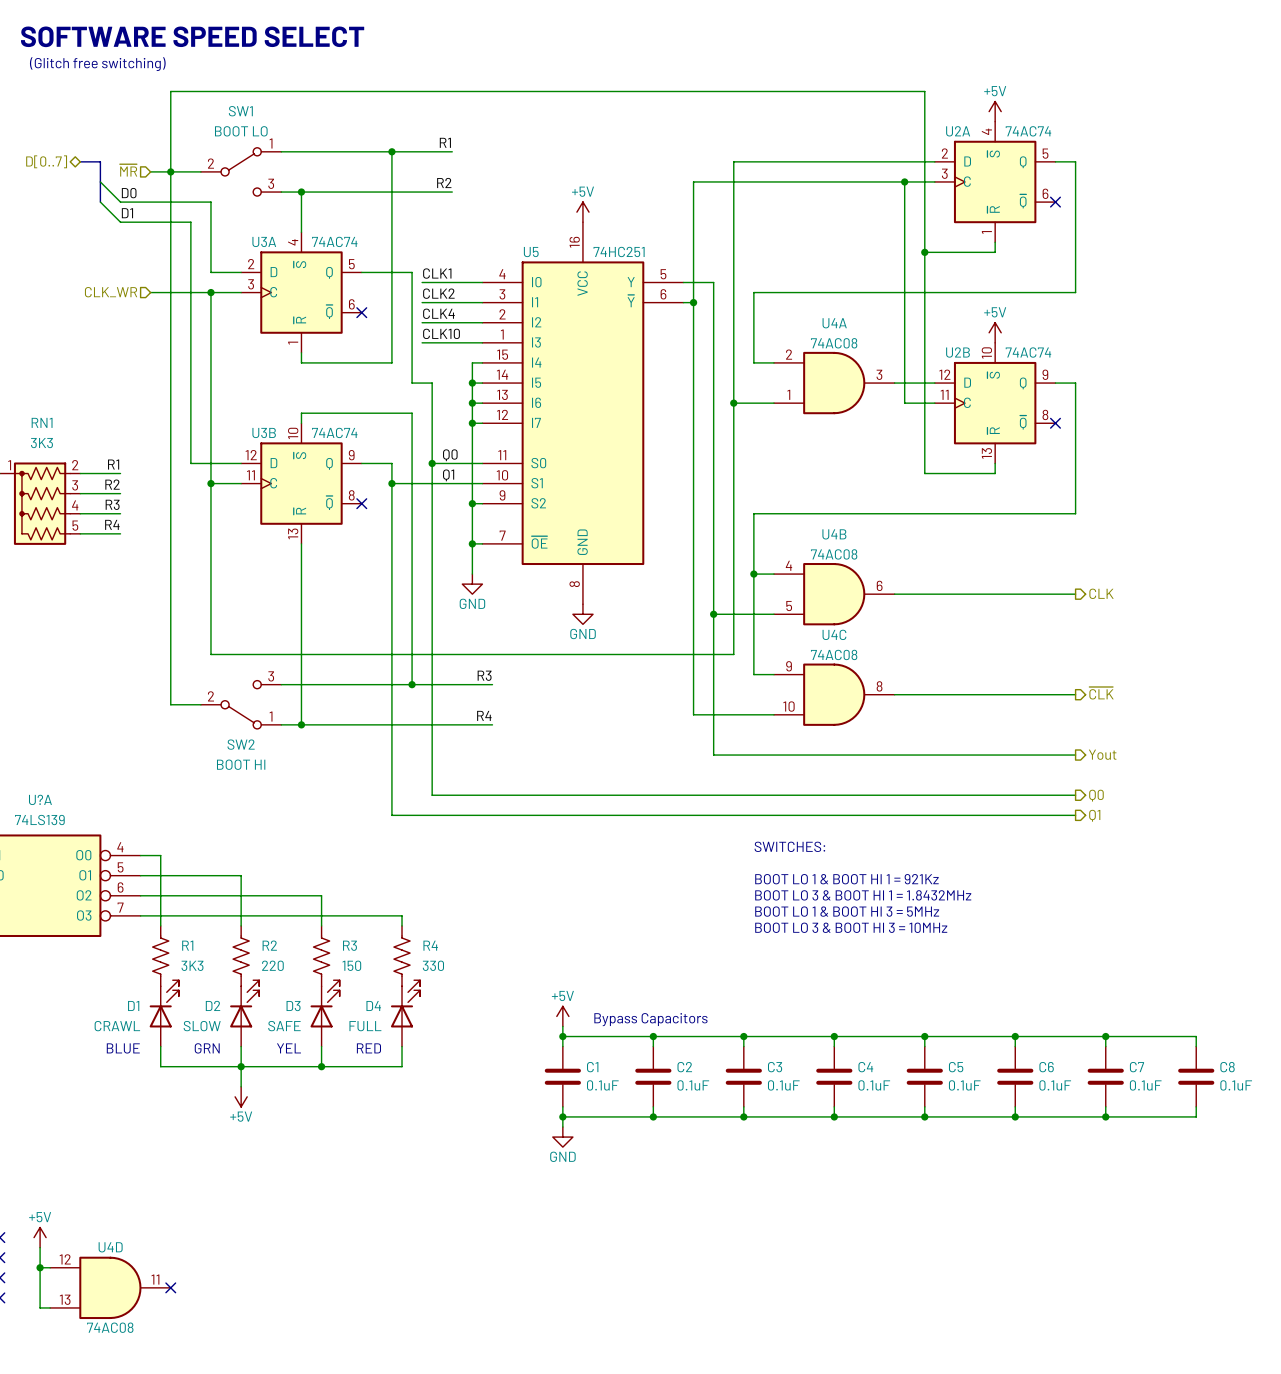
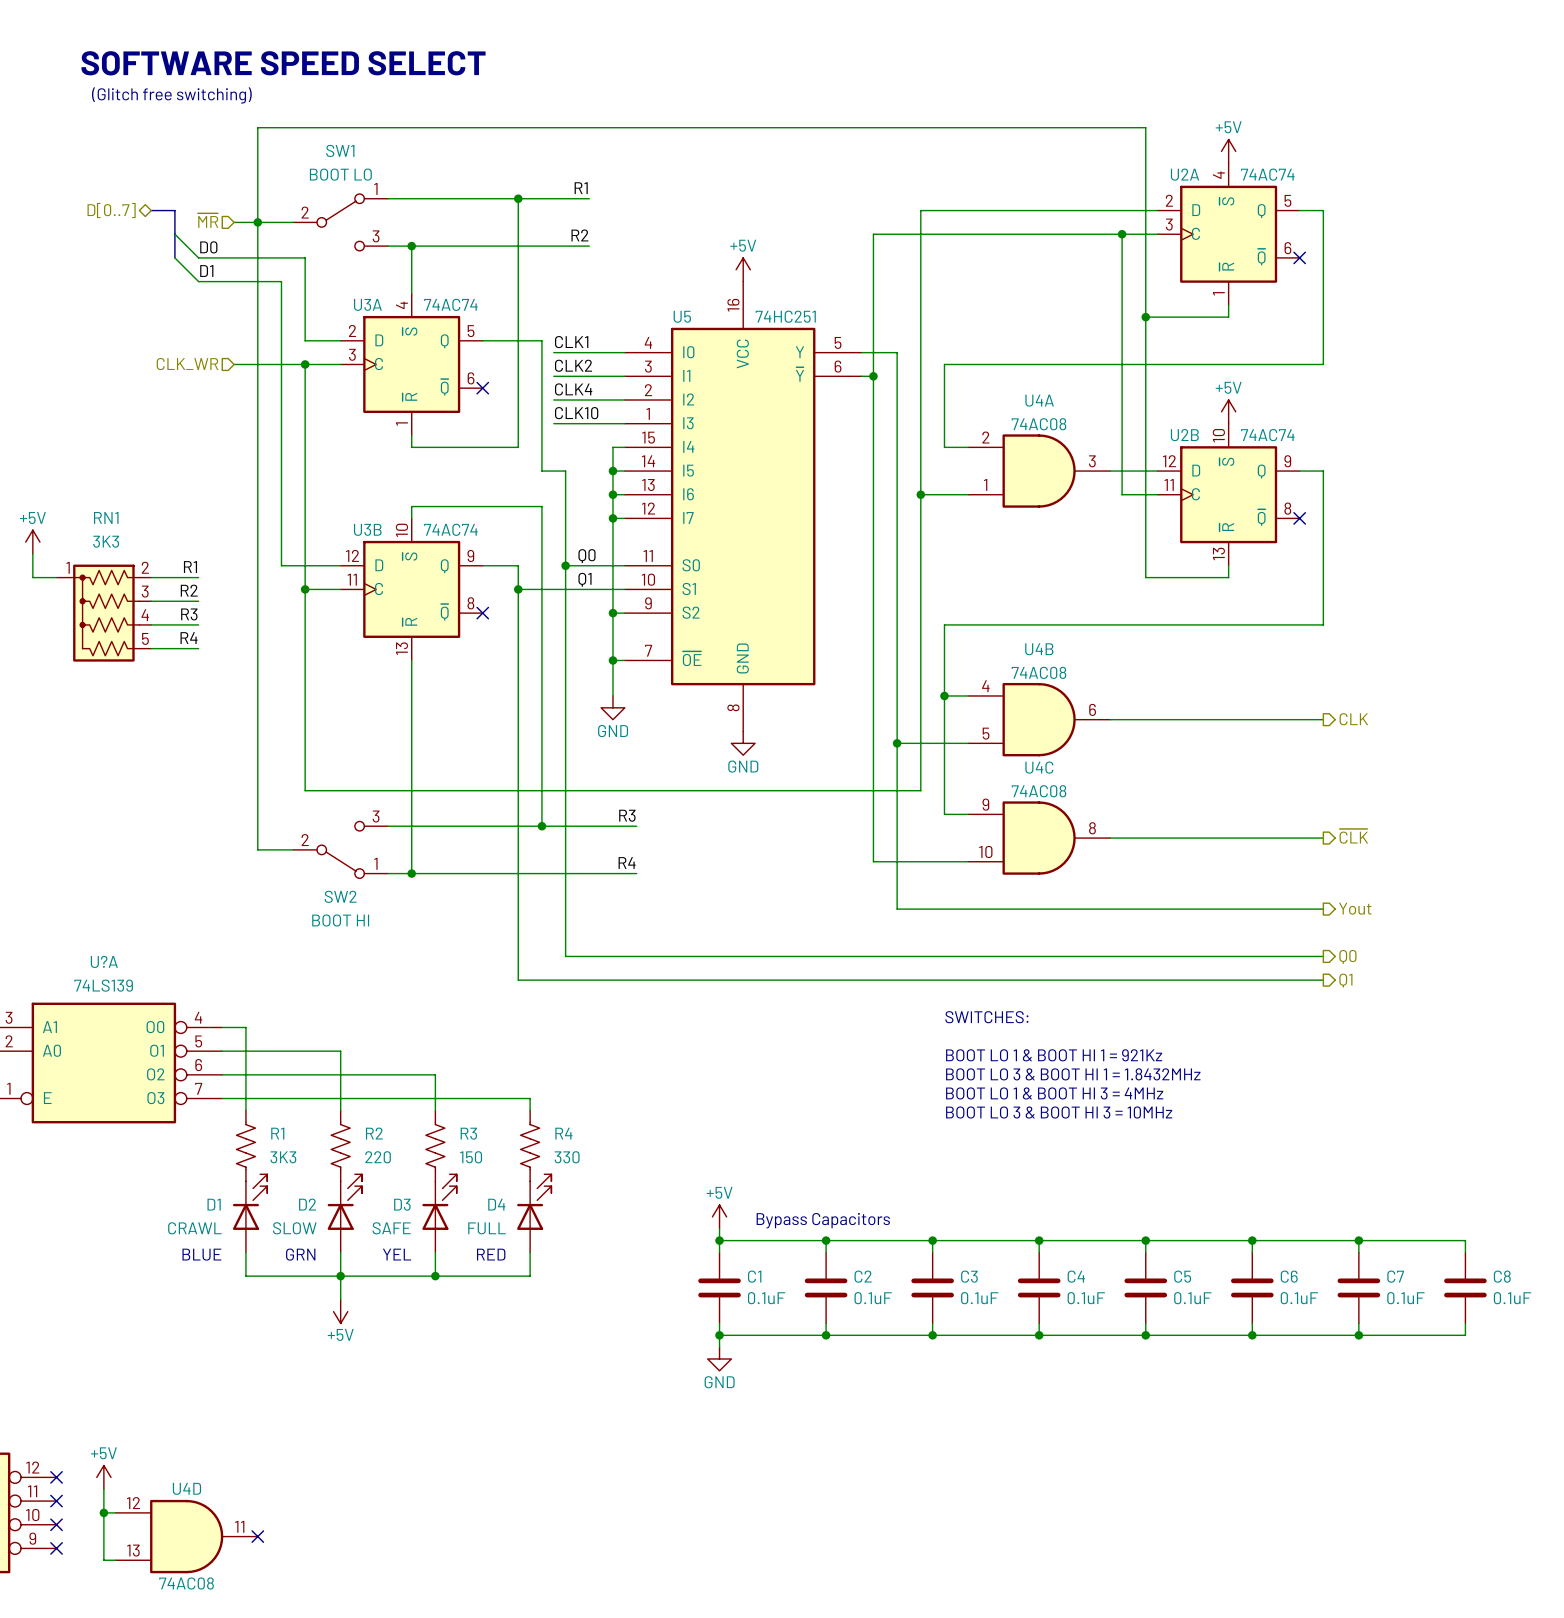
text: BOOT LO 1 & BOOT HI 3 = 5MHz (847, 911) -> BOOT LO 1 & BOOT HI 3 = 4MHz (1054, 1093)

